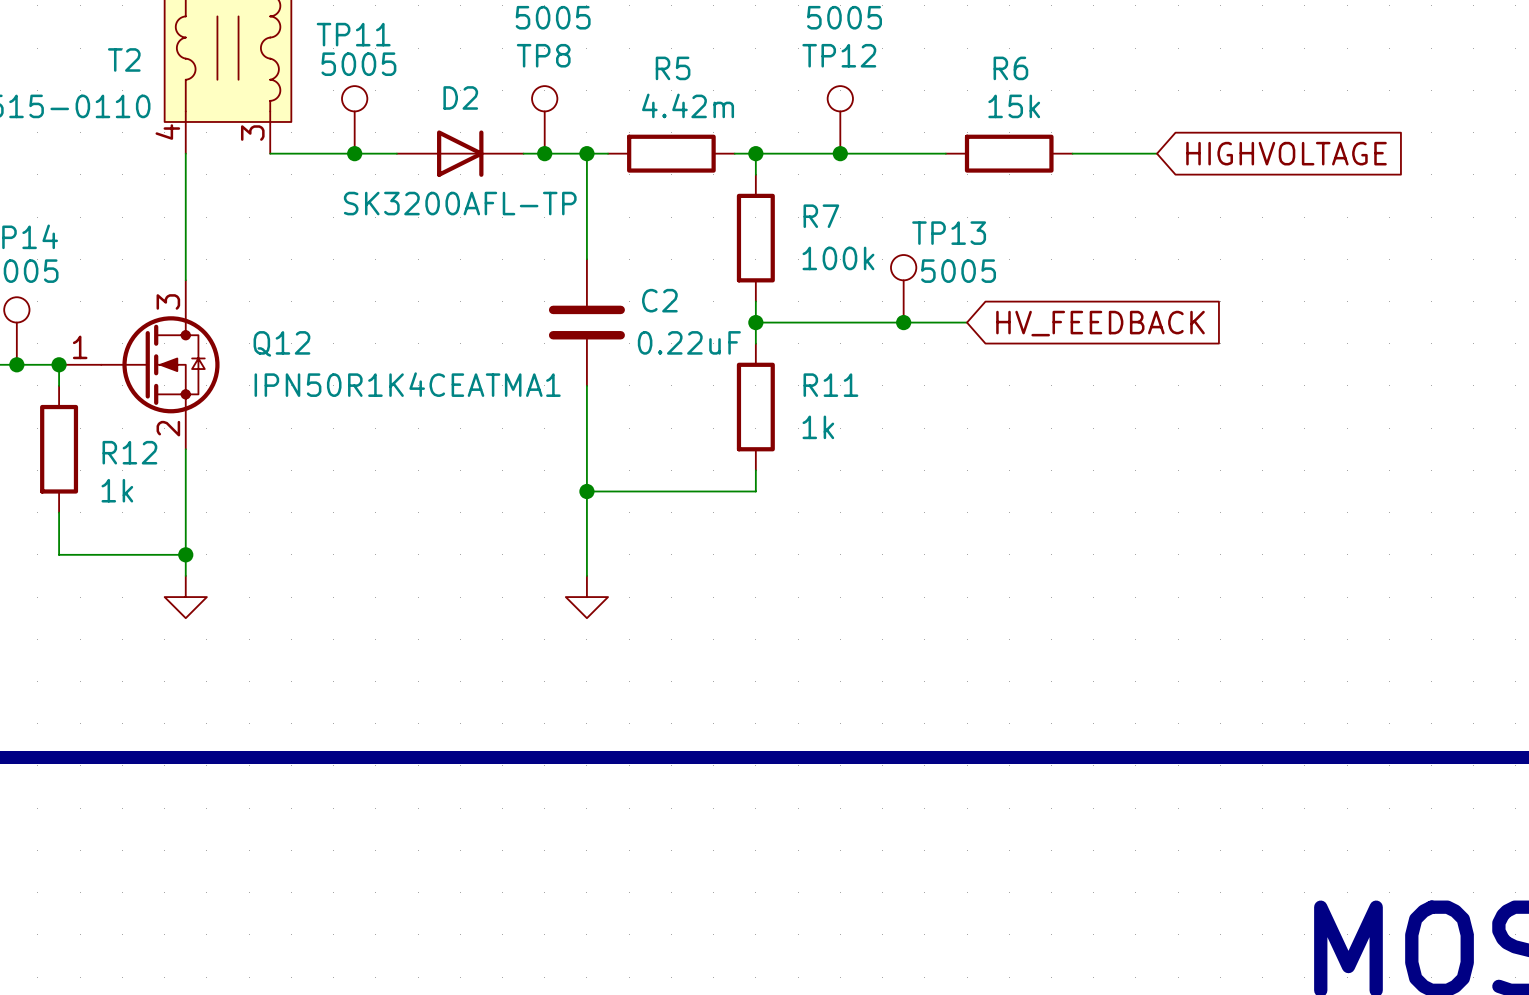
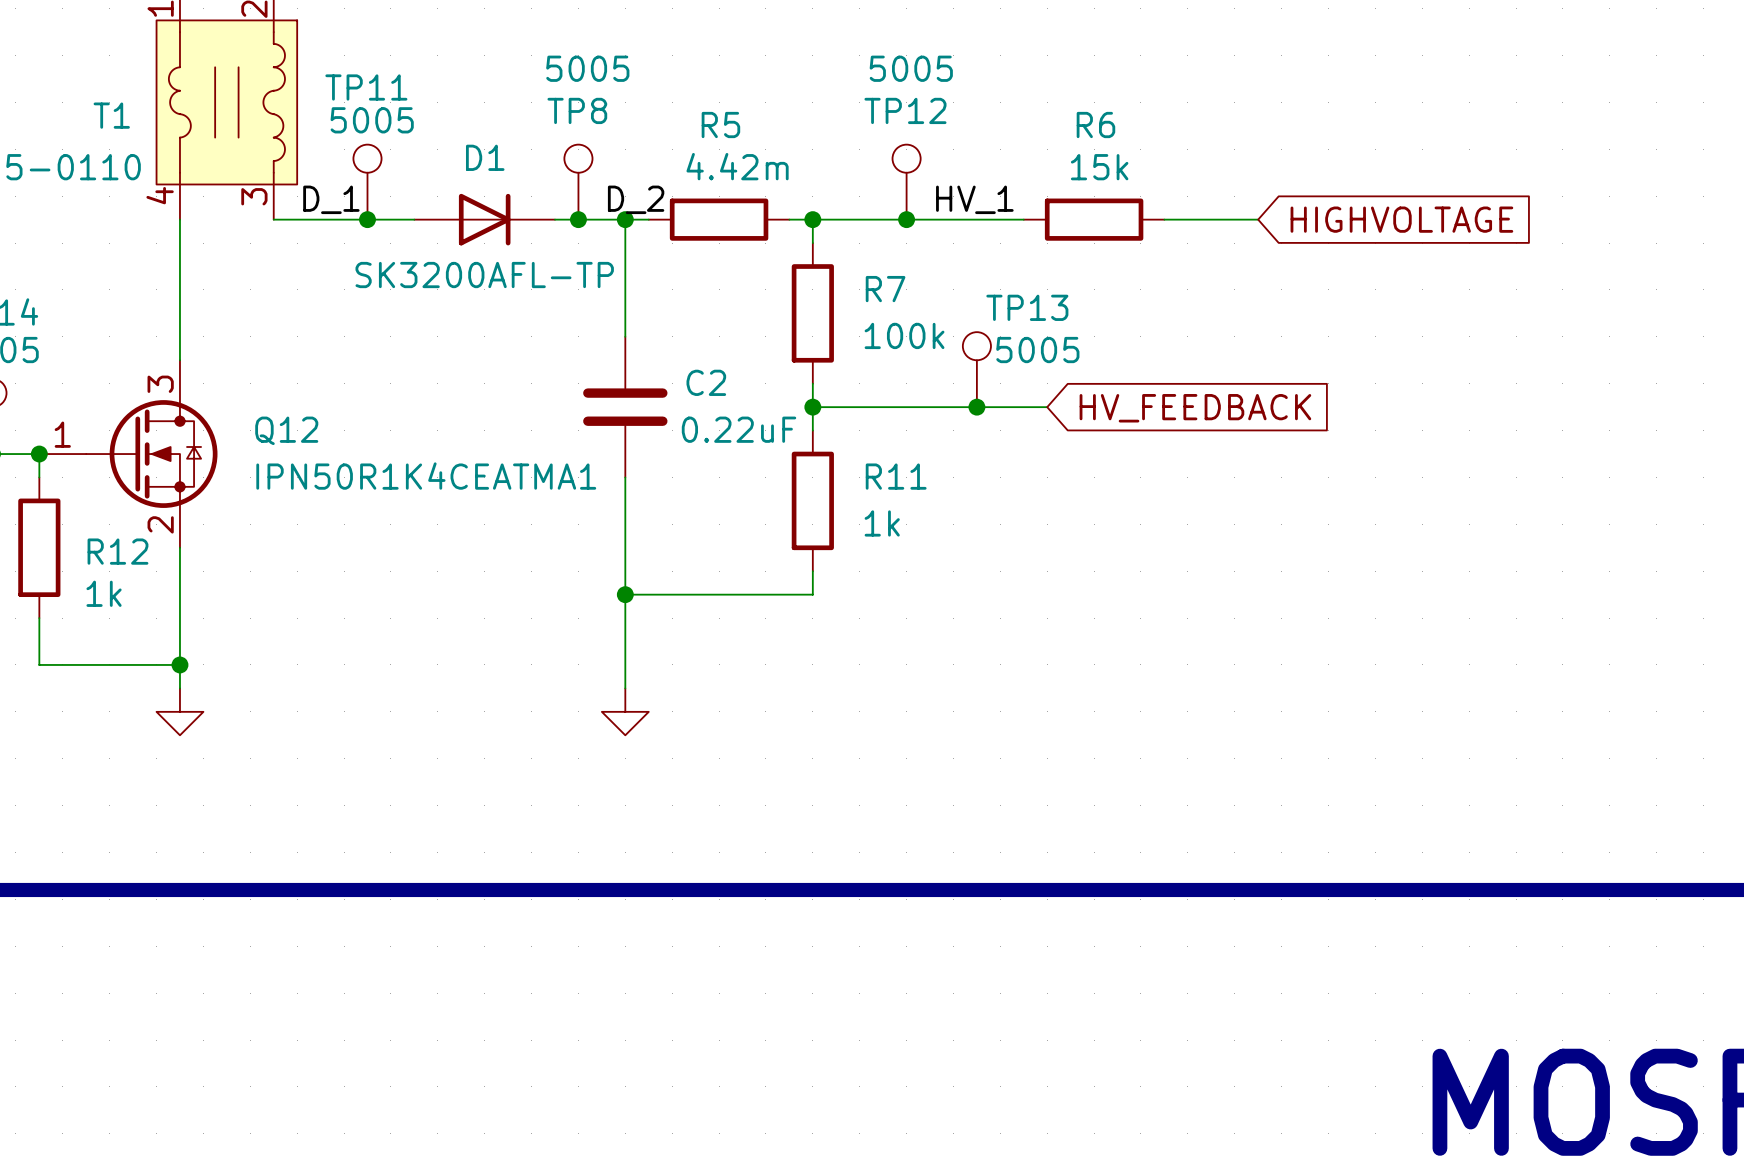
T2 name: T2 (124, 59) -> T1 (111, 115)
D2 name: D2 (460, 97) -> D1 (485, 157)
label: none -> D_1 (331, 199)
label: none -> D_2 (636, 199)
label: none -> HV_1 (974, 199)

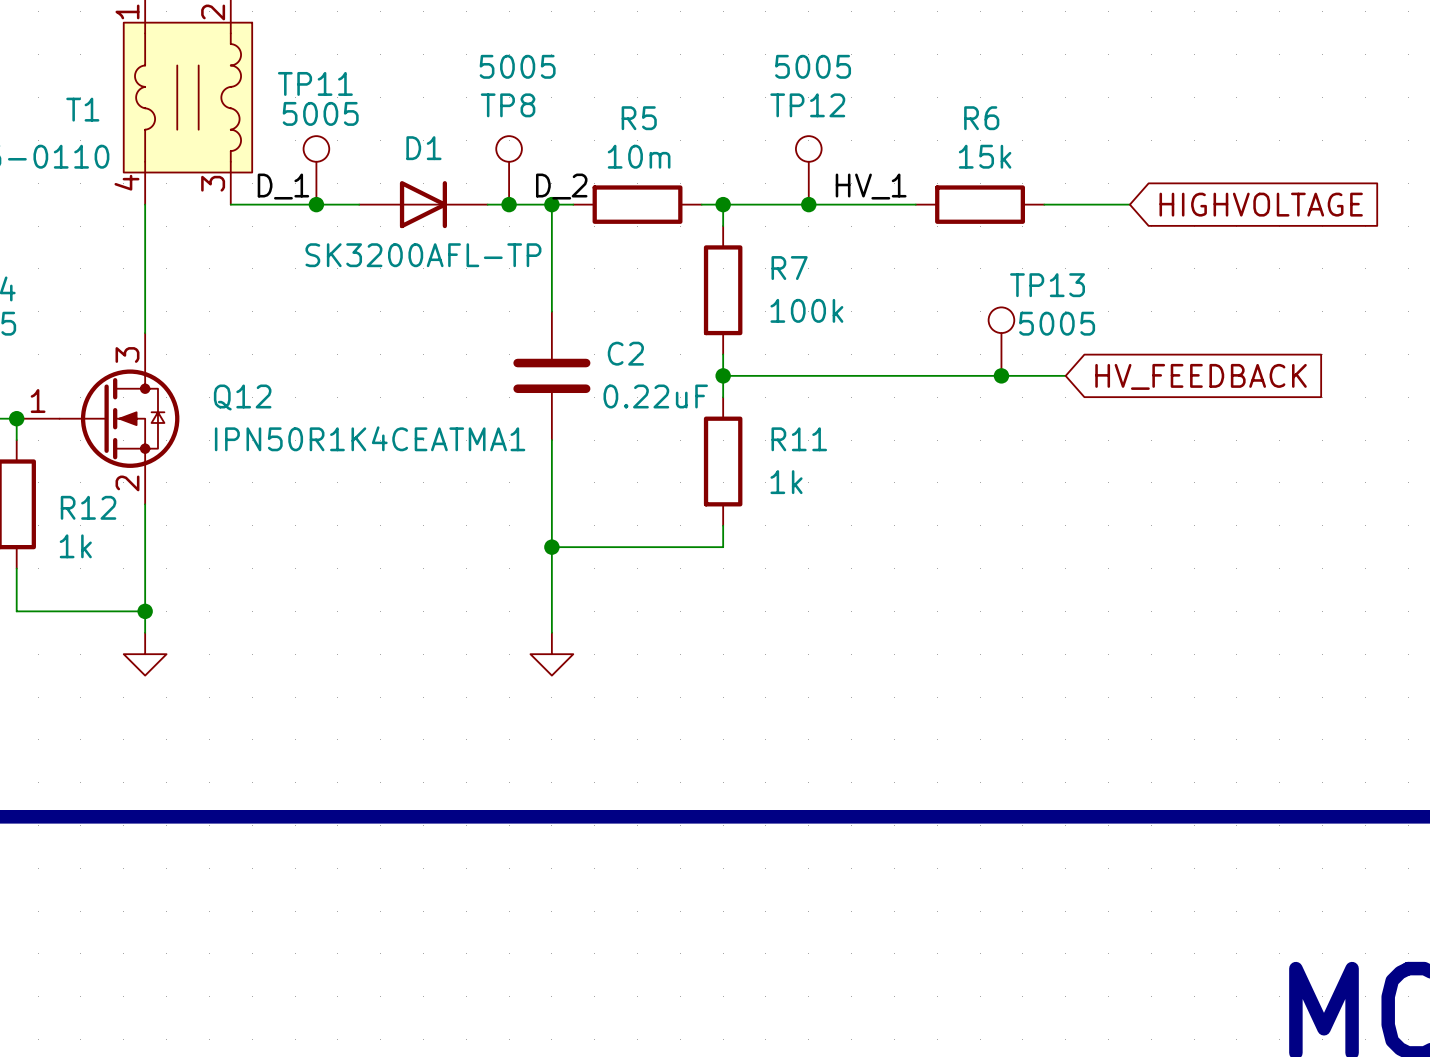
R5 value: 4.42m (737, 166) -> 10m (639, 156)
TP13 position: (976, 369) -> (1001, 341)
junction: (976, 407) -> none
wire: none -> (937, 375) (1065, 375)
junction: none -> (1001, 375)
global label position: HV_FEEDBACK (1195, 408) -> HV_FEEDBACK (1201, 376)

